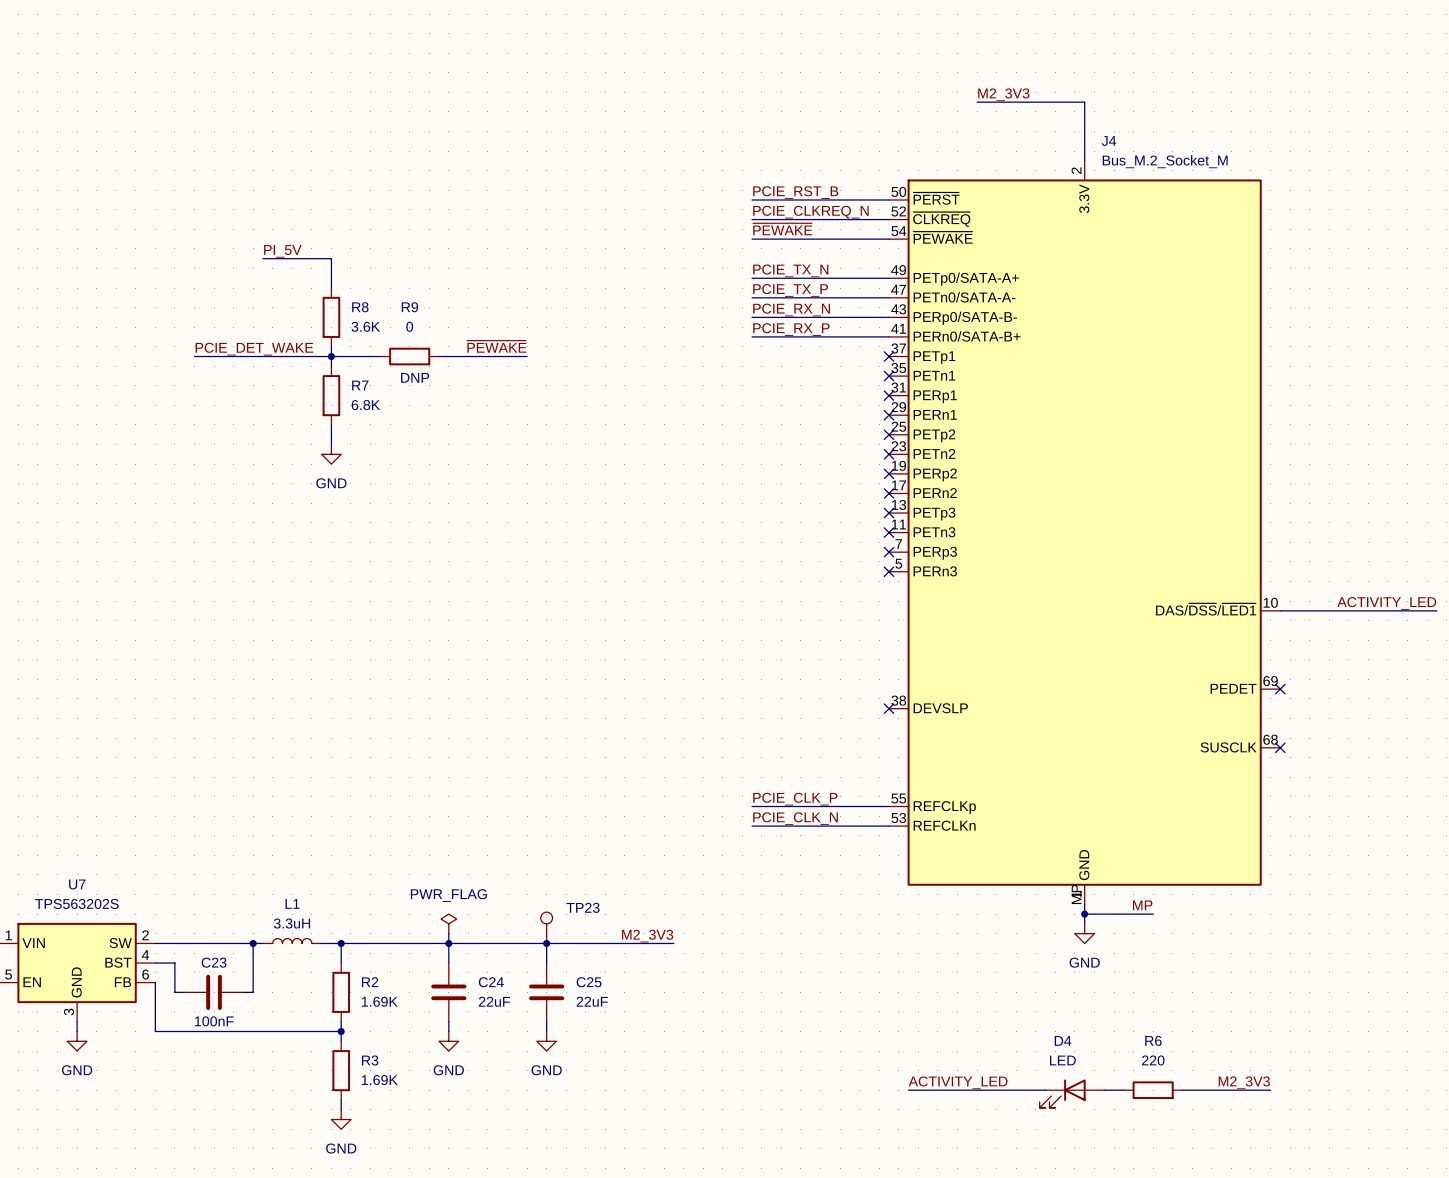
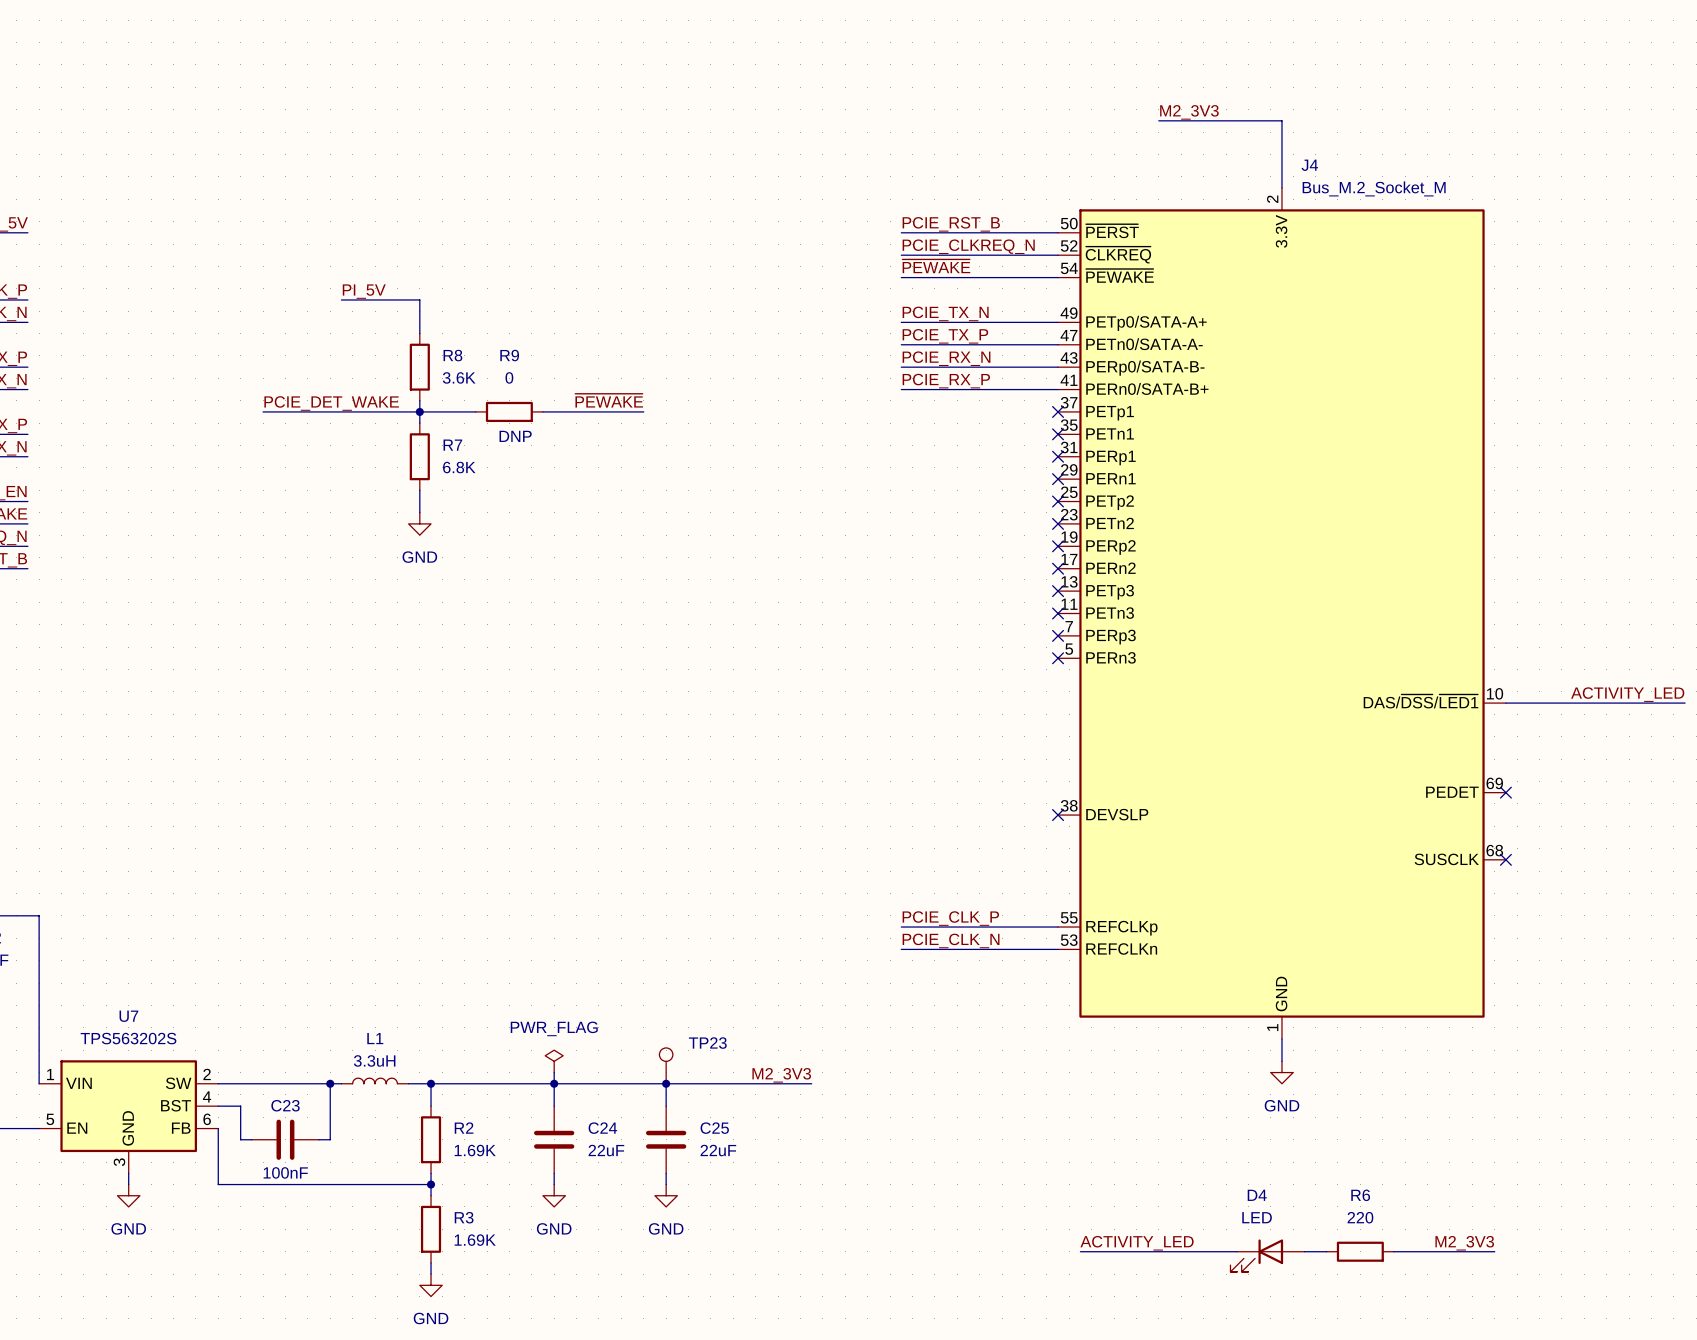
J4 symbol: [889, 160, 1281, 905] -> [1058, 188, 1506, 1039]
label: MP (1142, 905) -> none
wire: (1084, 914) (1153, 914) -> none
junction: (1084, 914) -> none

